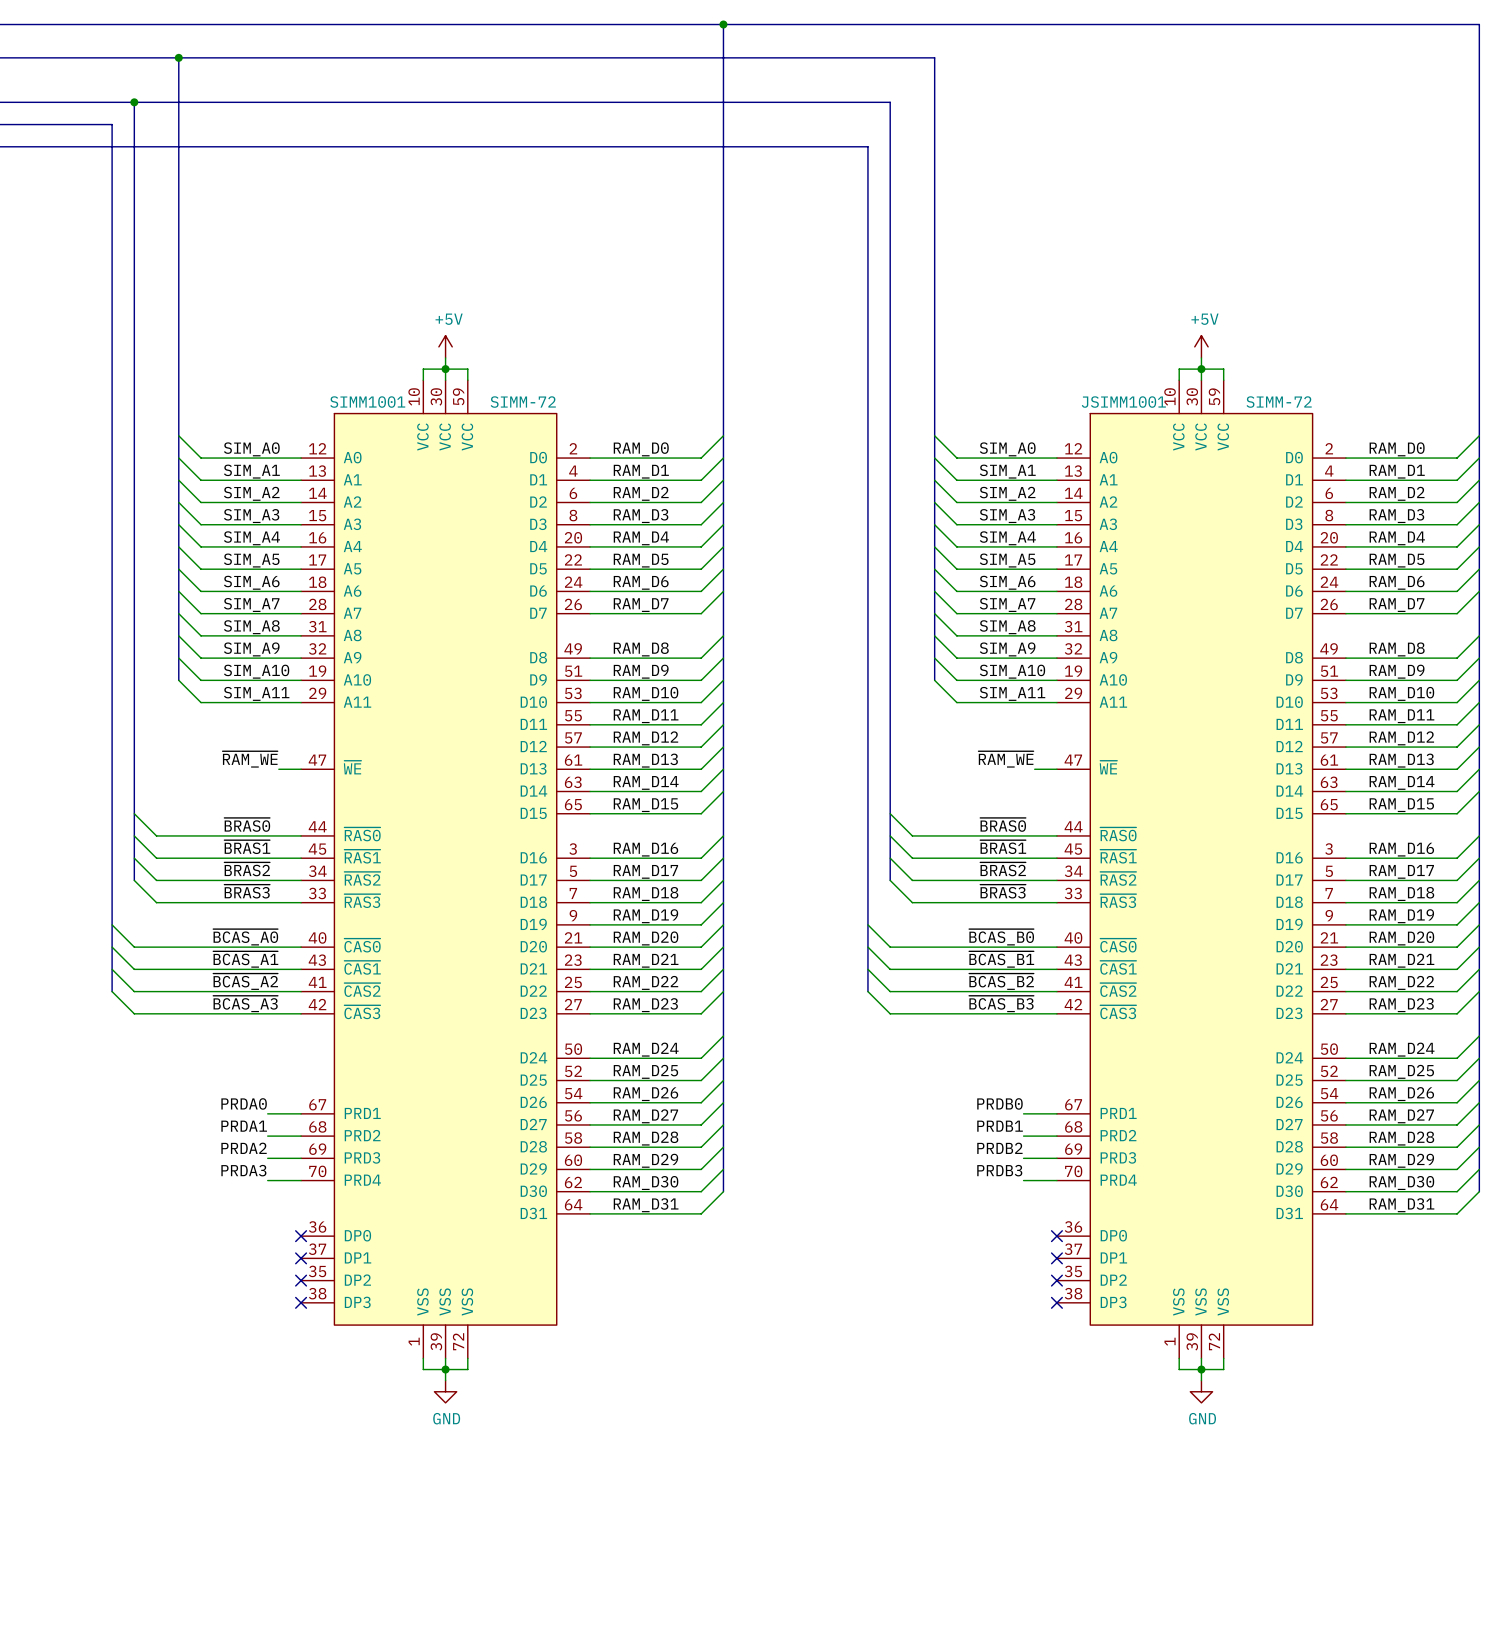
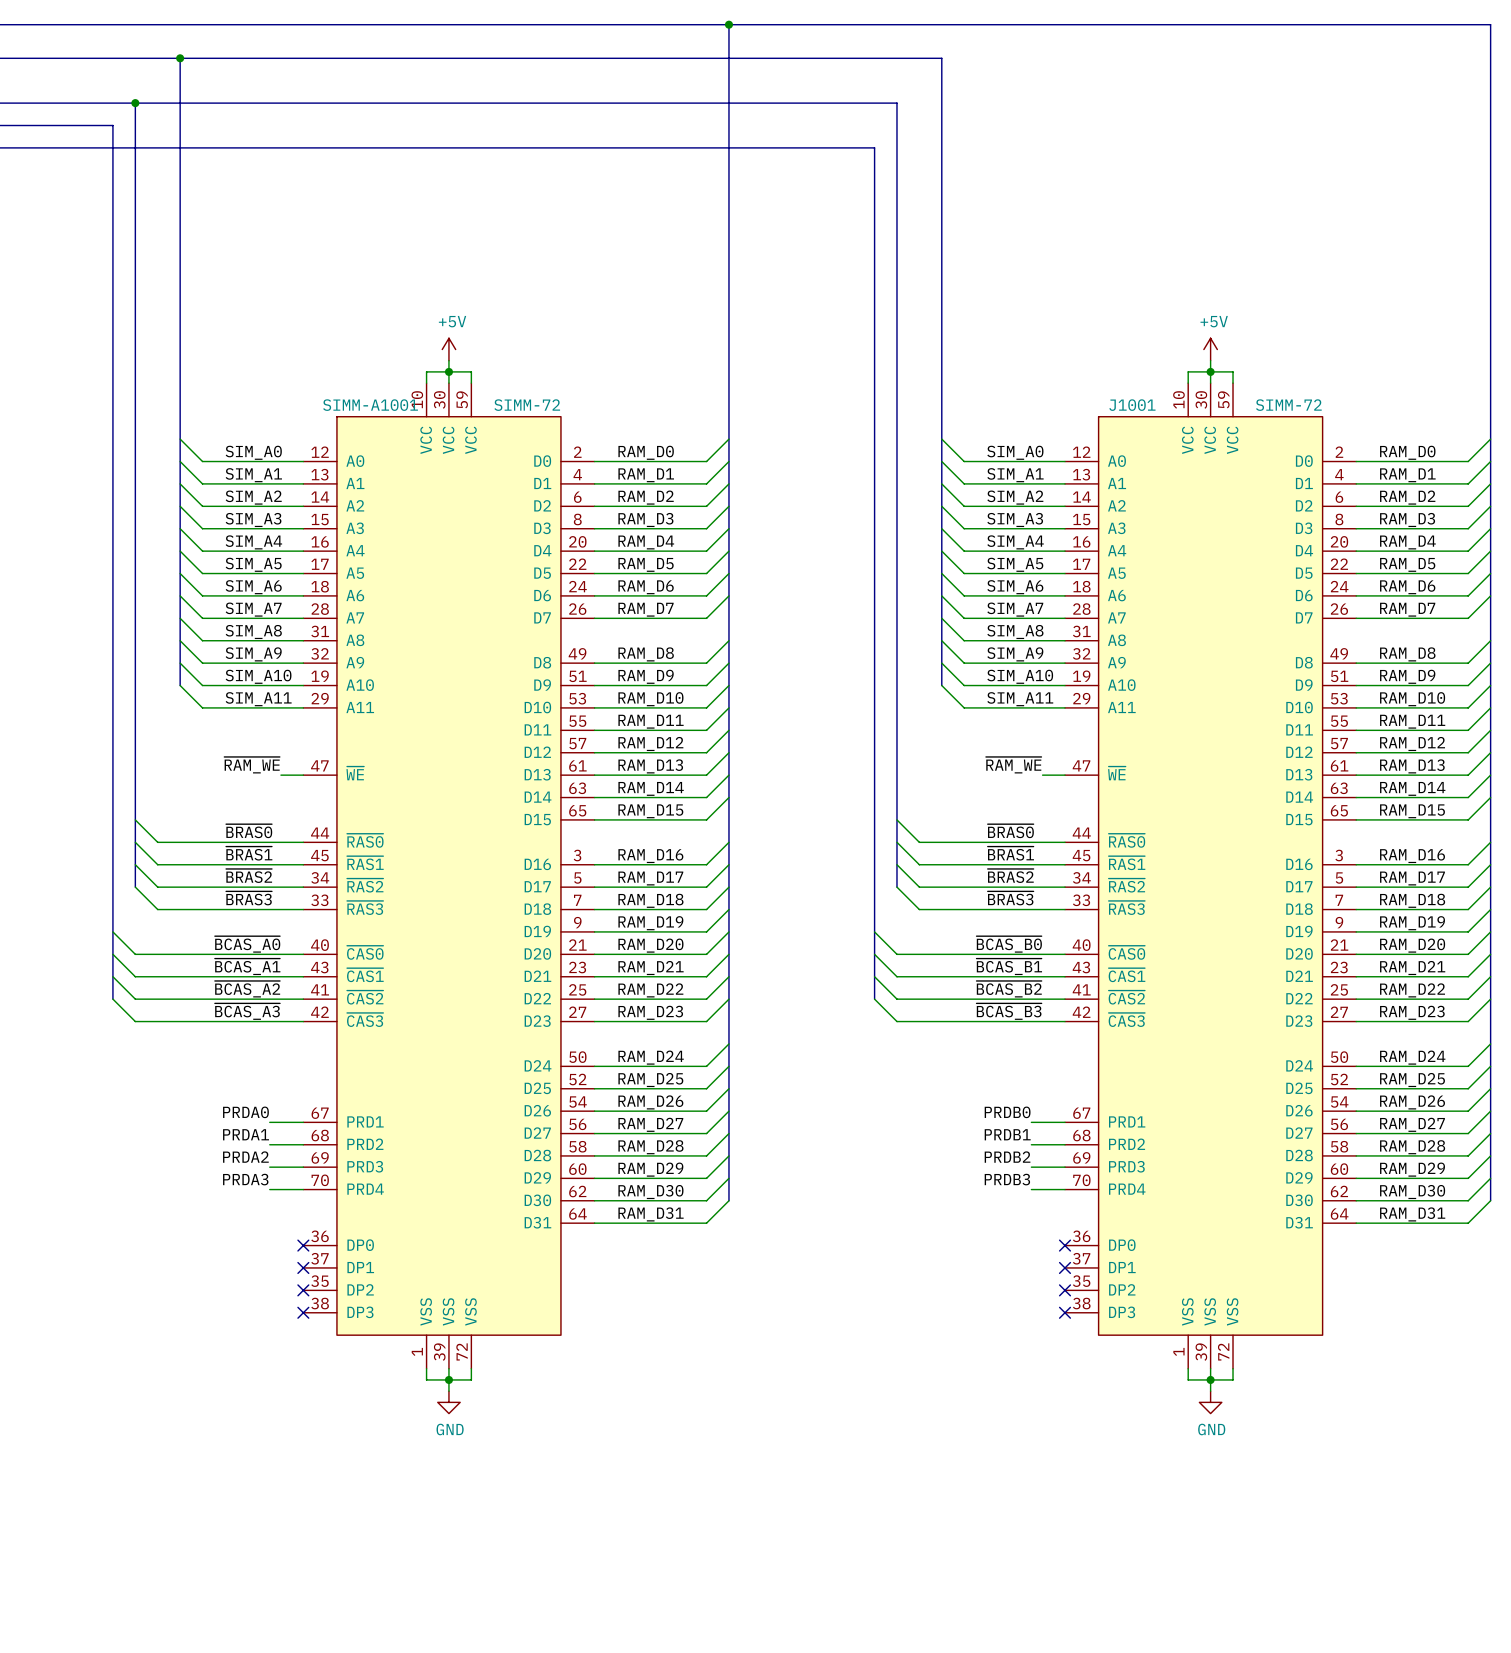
SIMM1001 name: SIMM1001 (367, 402) -> SIMM-A1001 (370, 405)
JSIMM1001 name: JSIMM1001 (1123, 402) -> J1001 (1132, 405)

